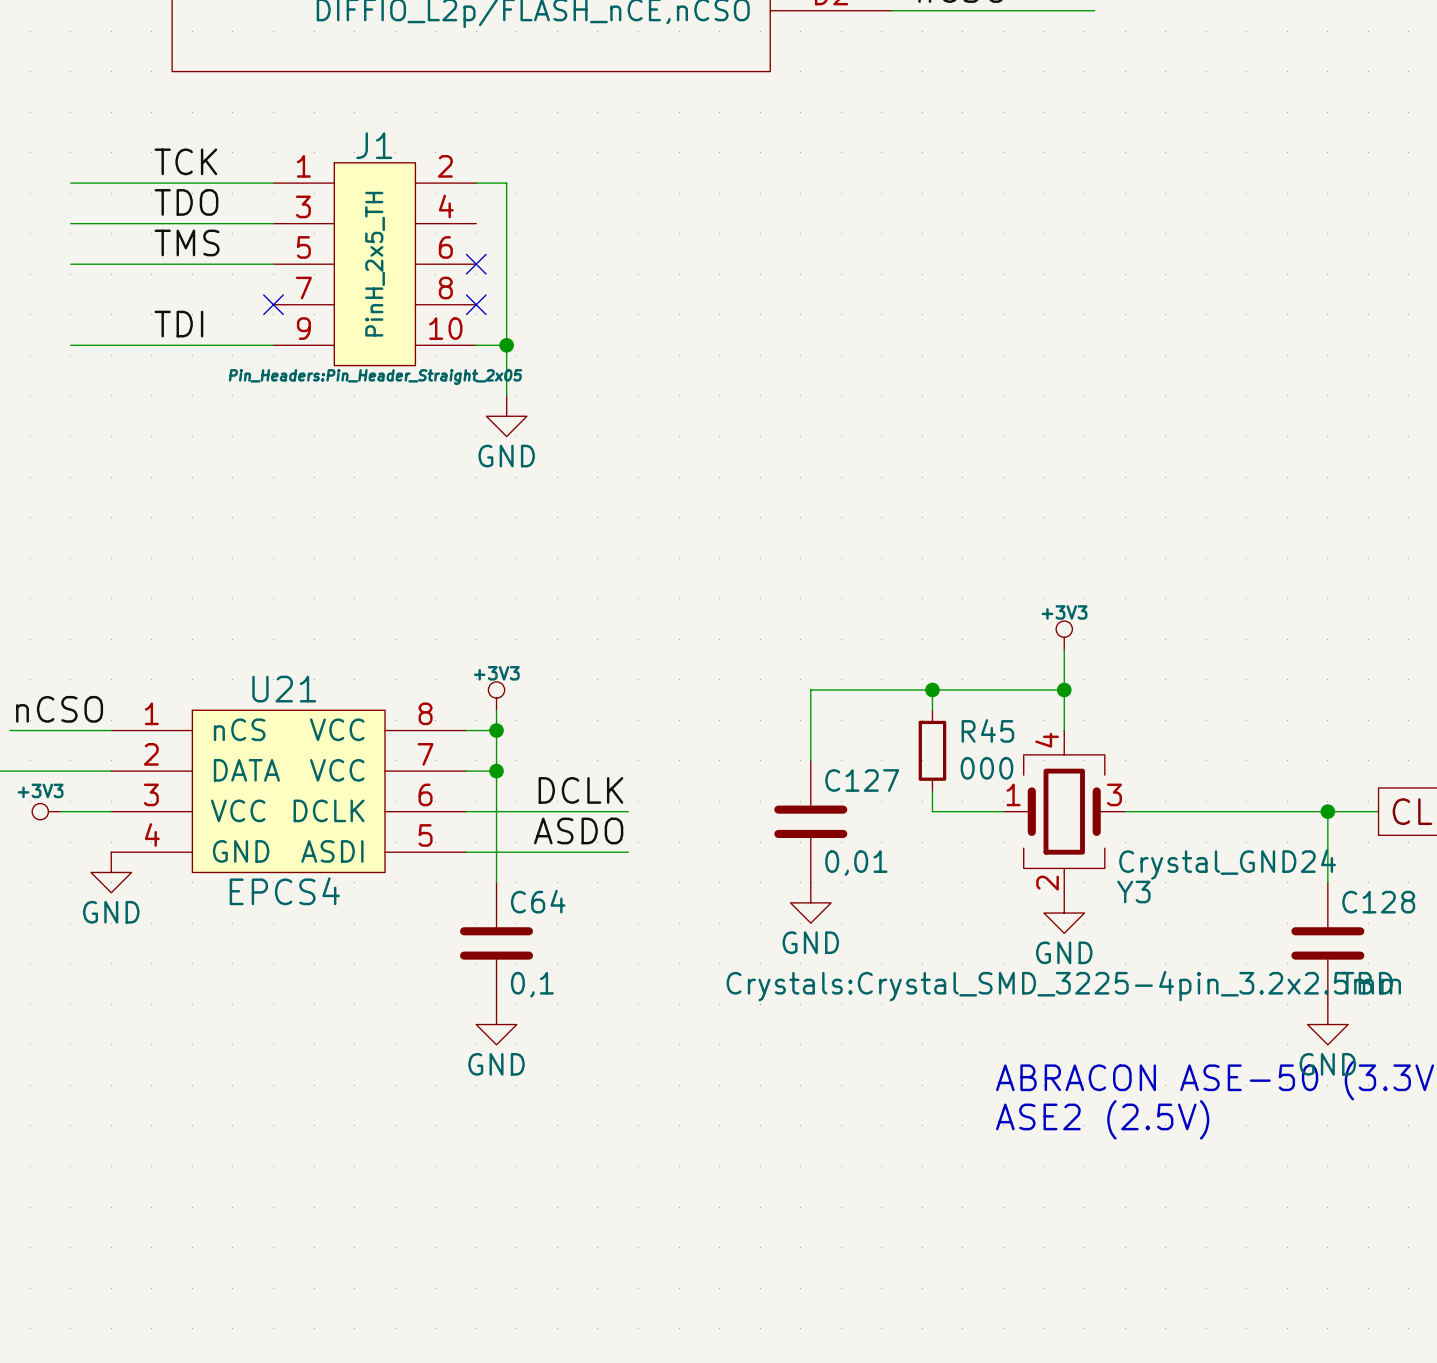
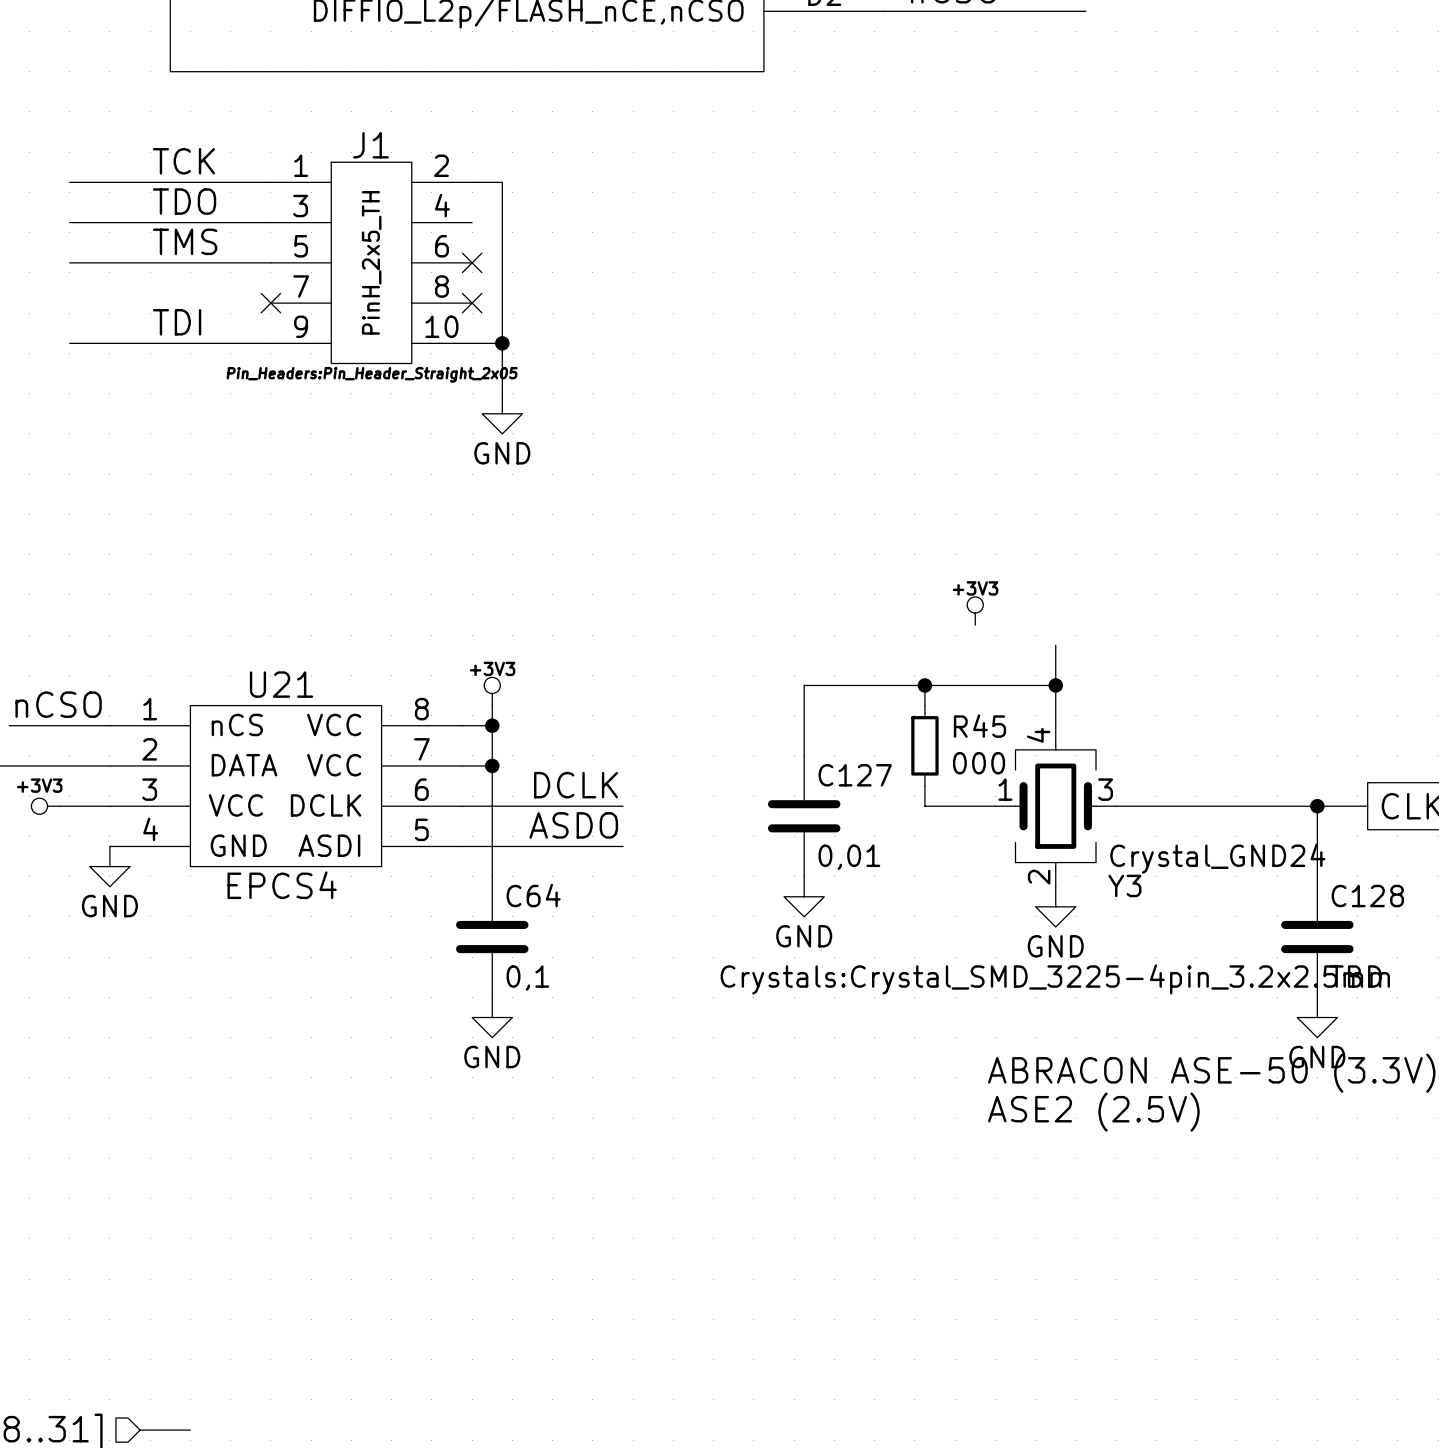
power symbol position: +3V3 (1064, 635) -> +3V3 (975, 611)

